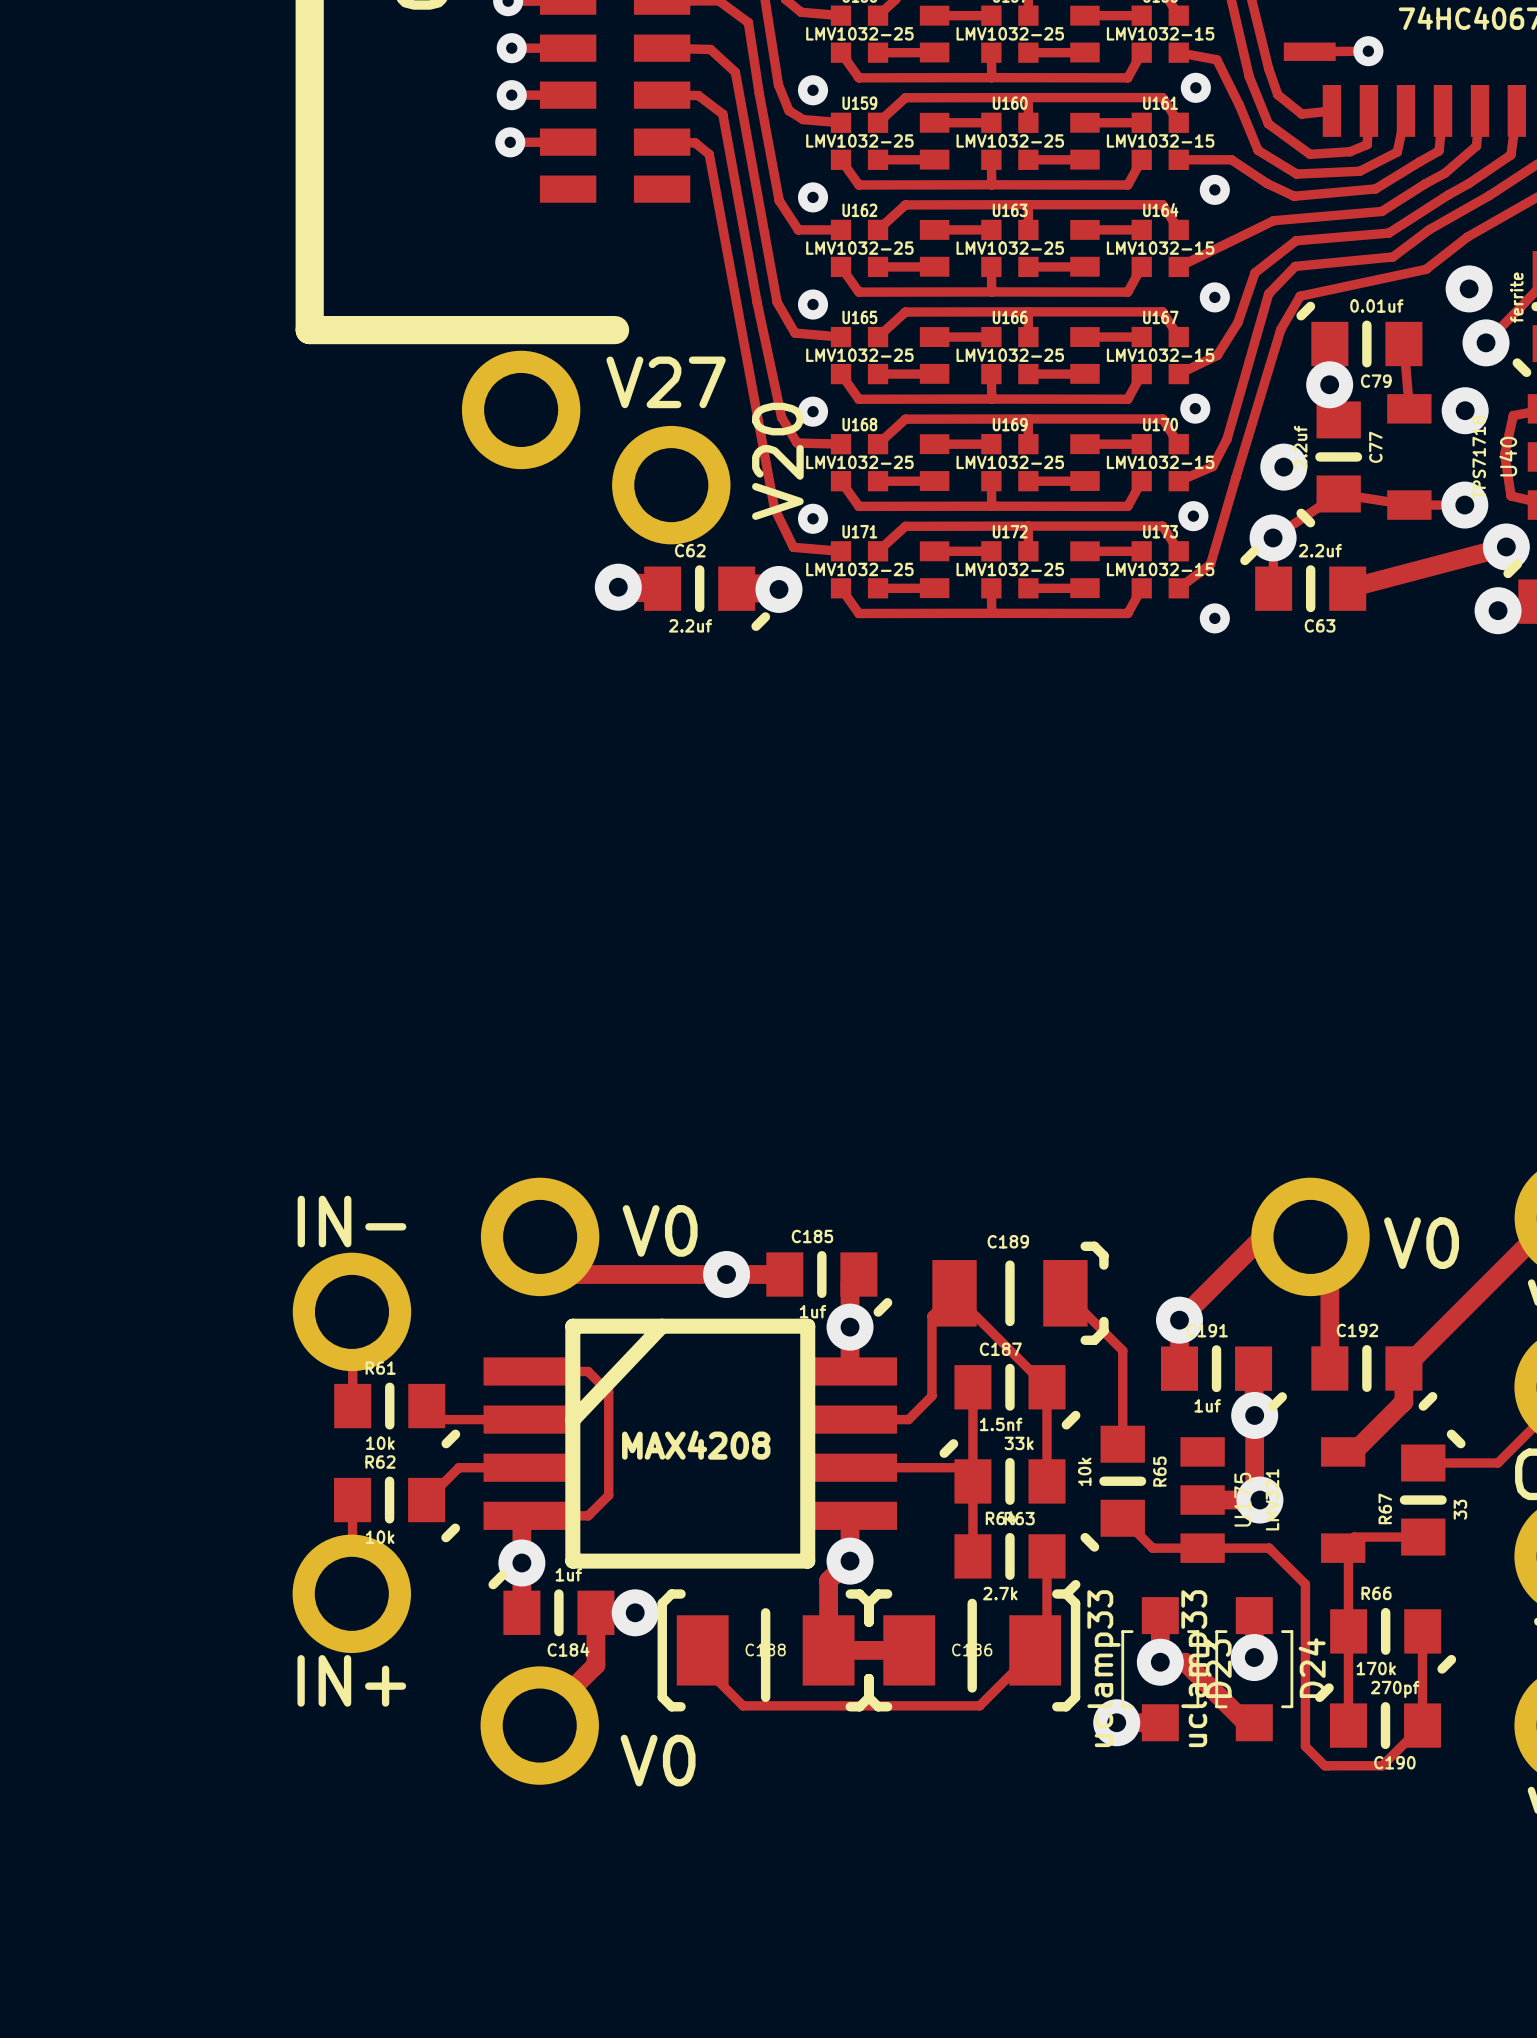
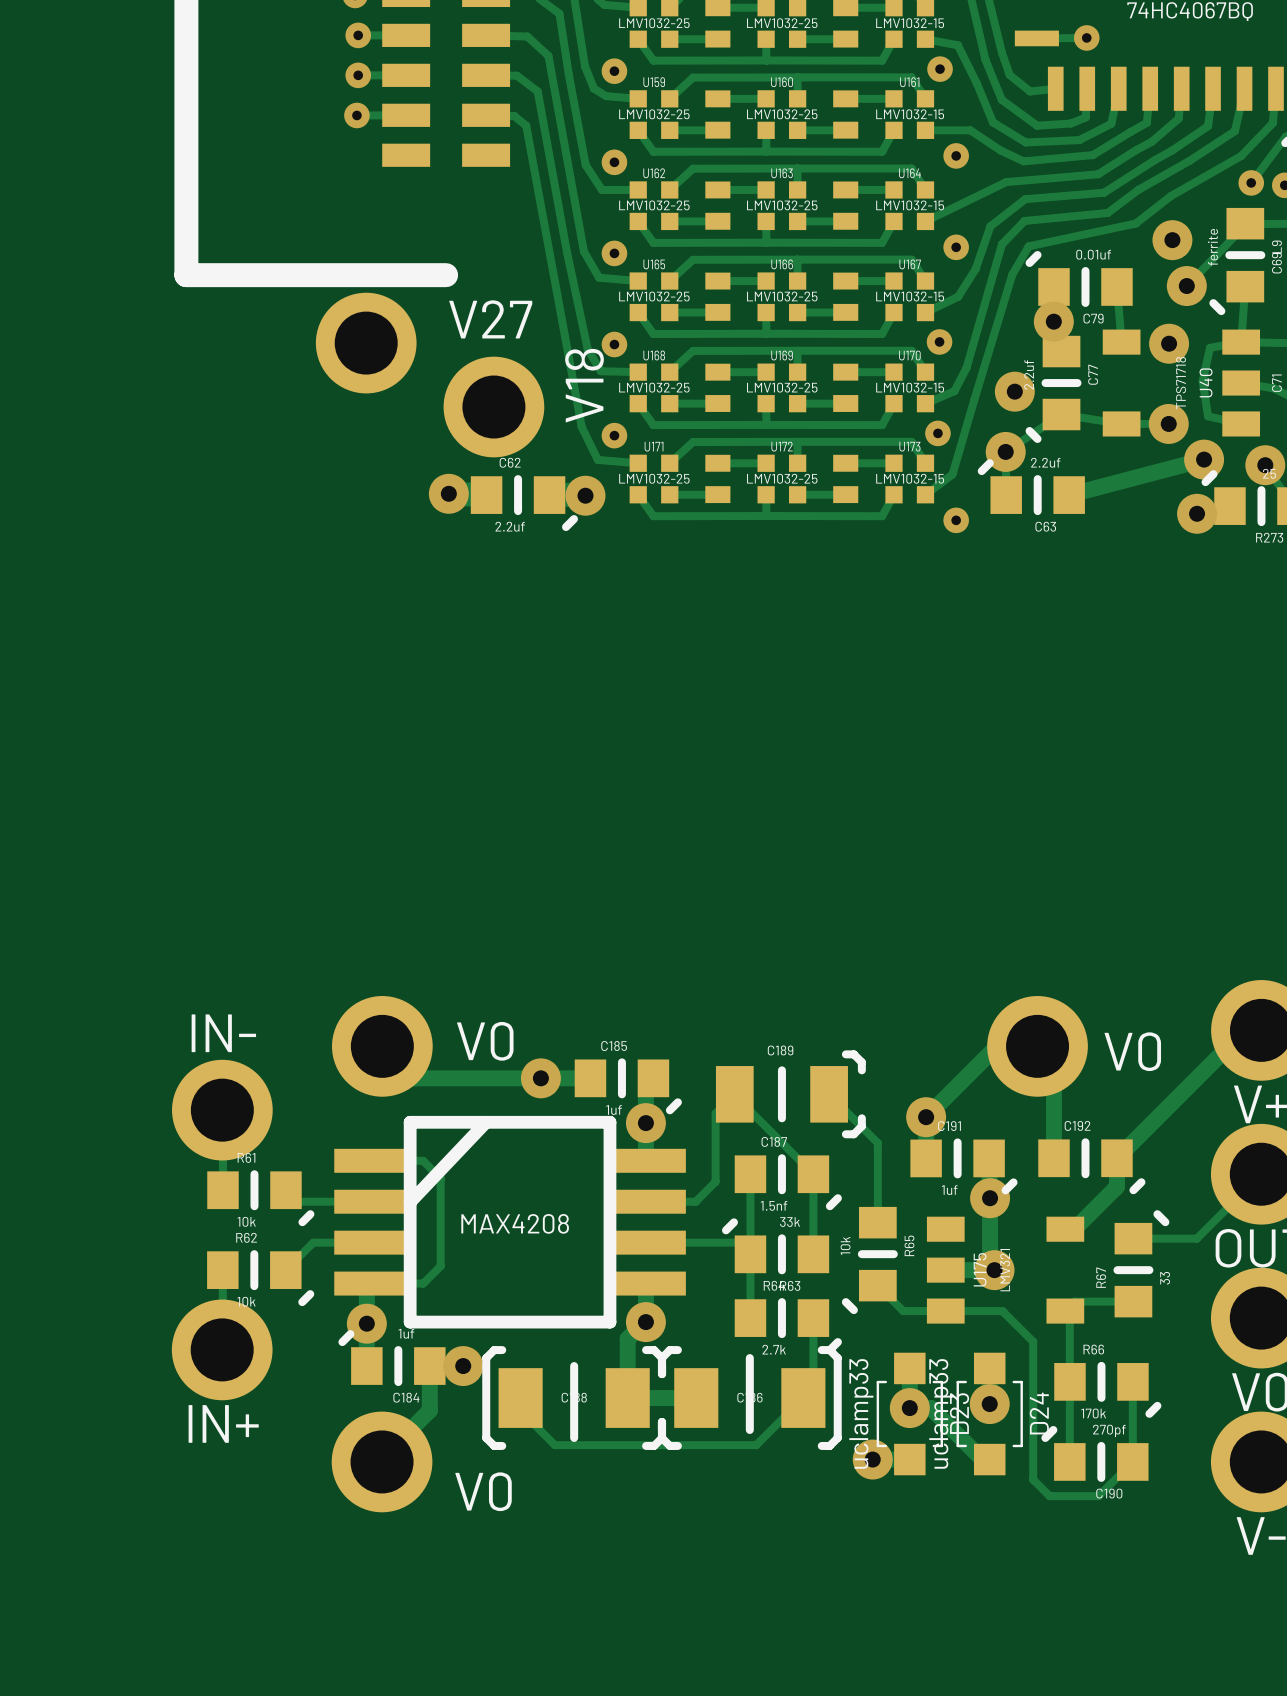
part value: V20 (777, 461) -> V18 (584, 385)

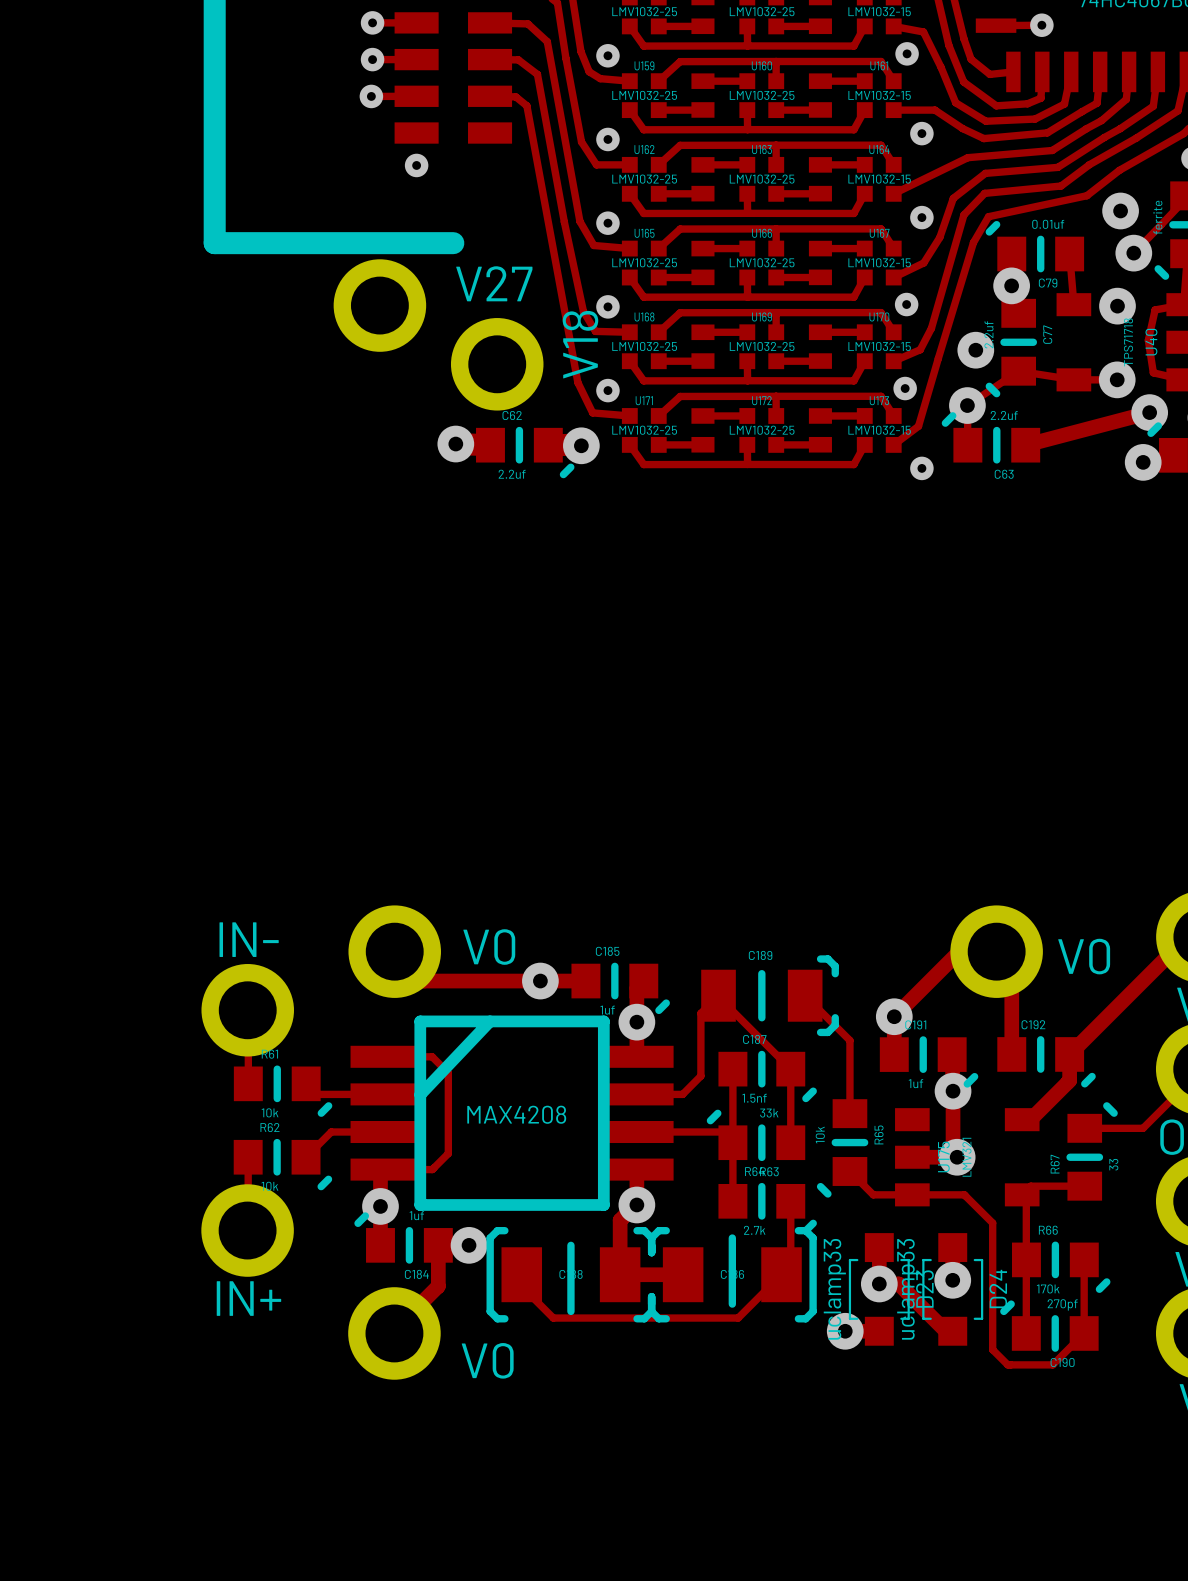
via: none -> (416, 165)

